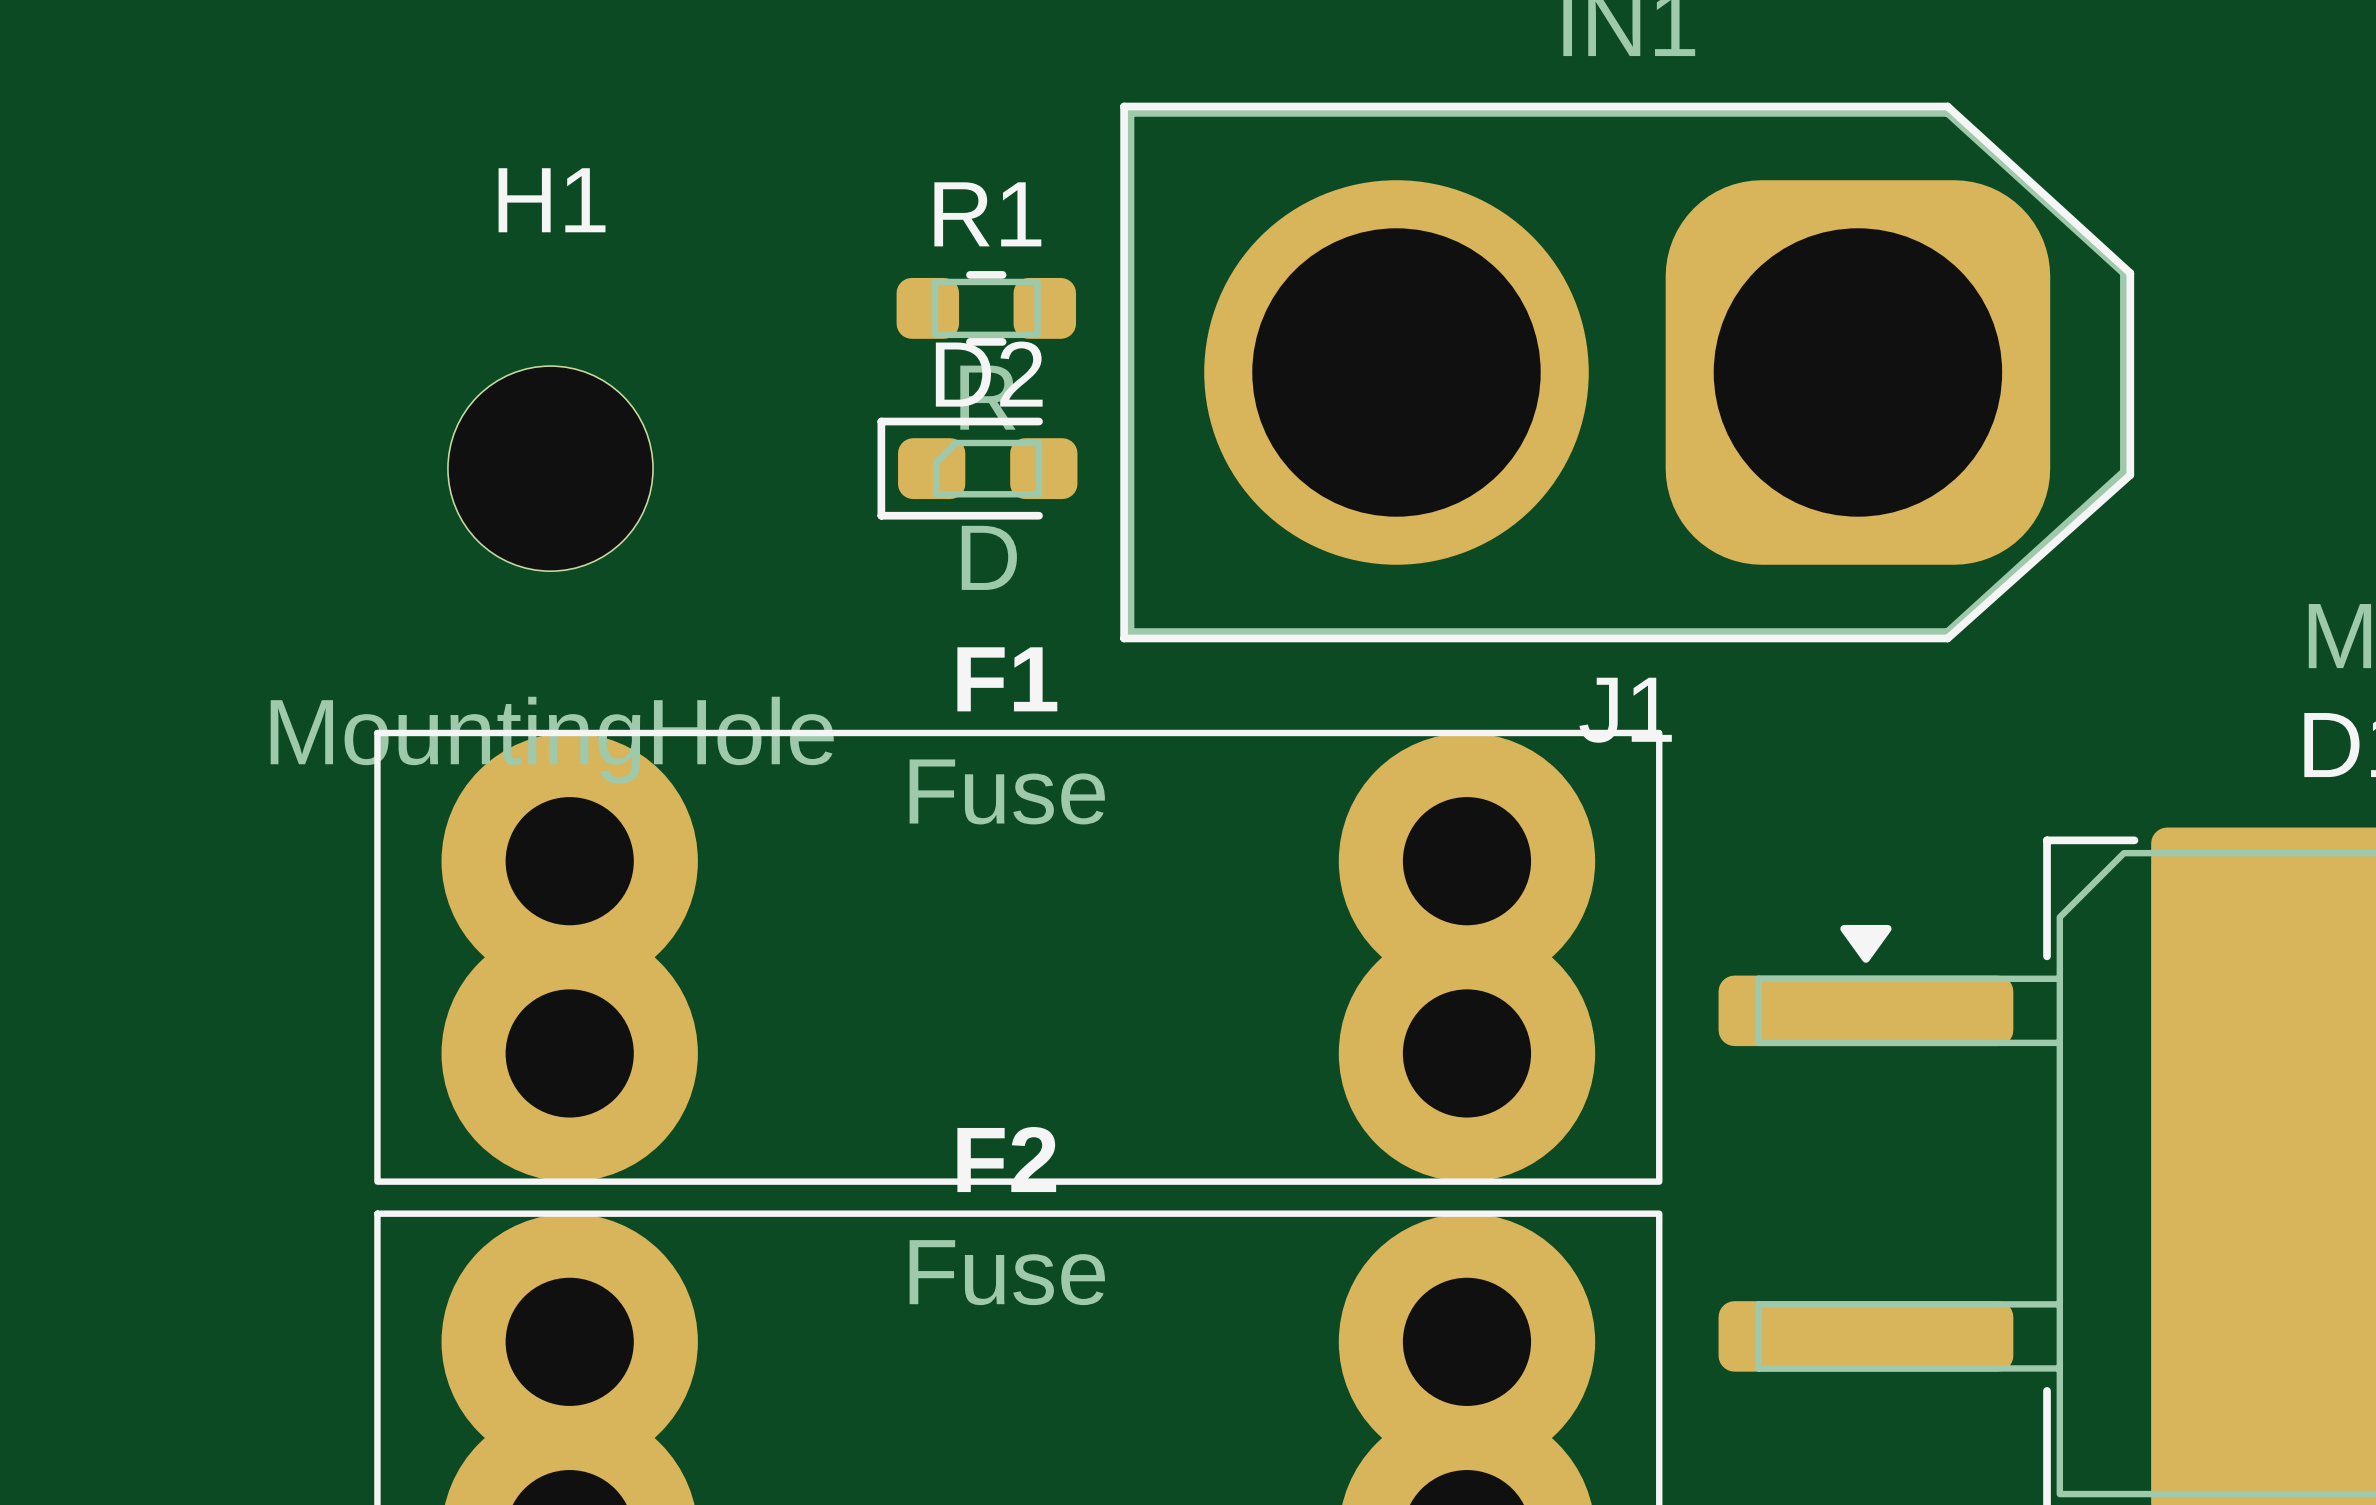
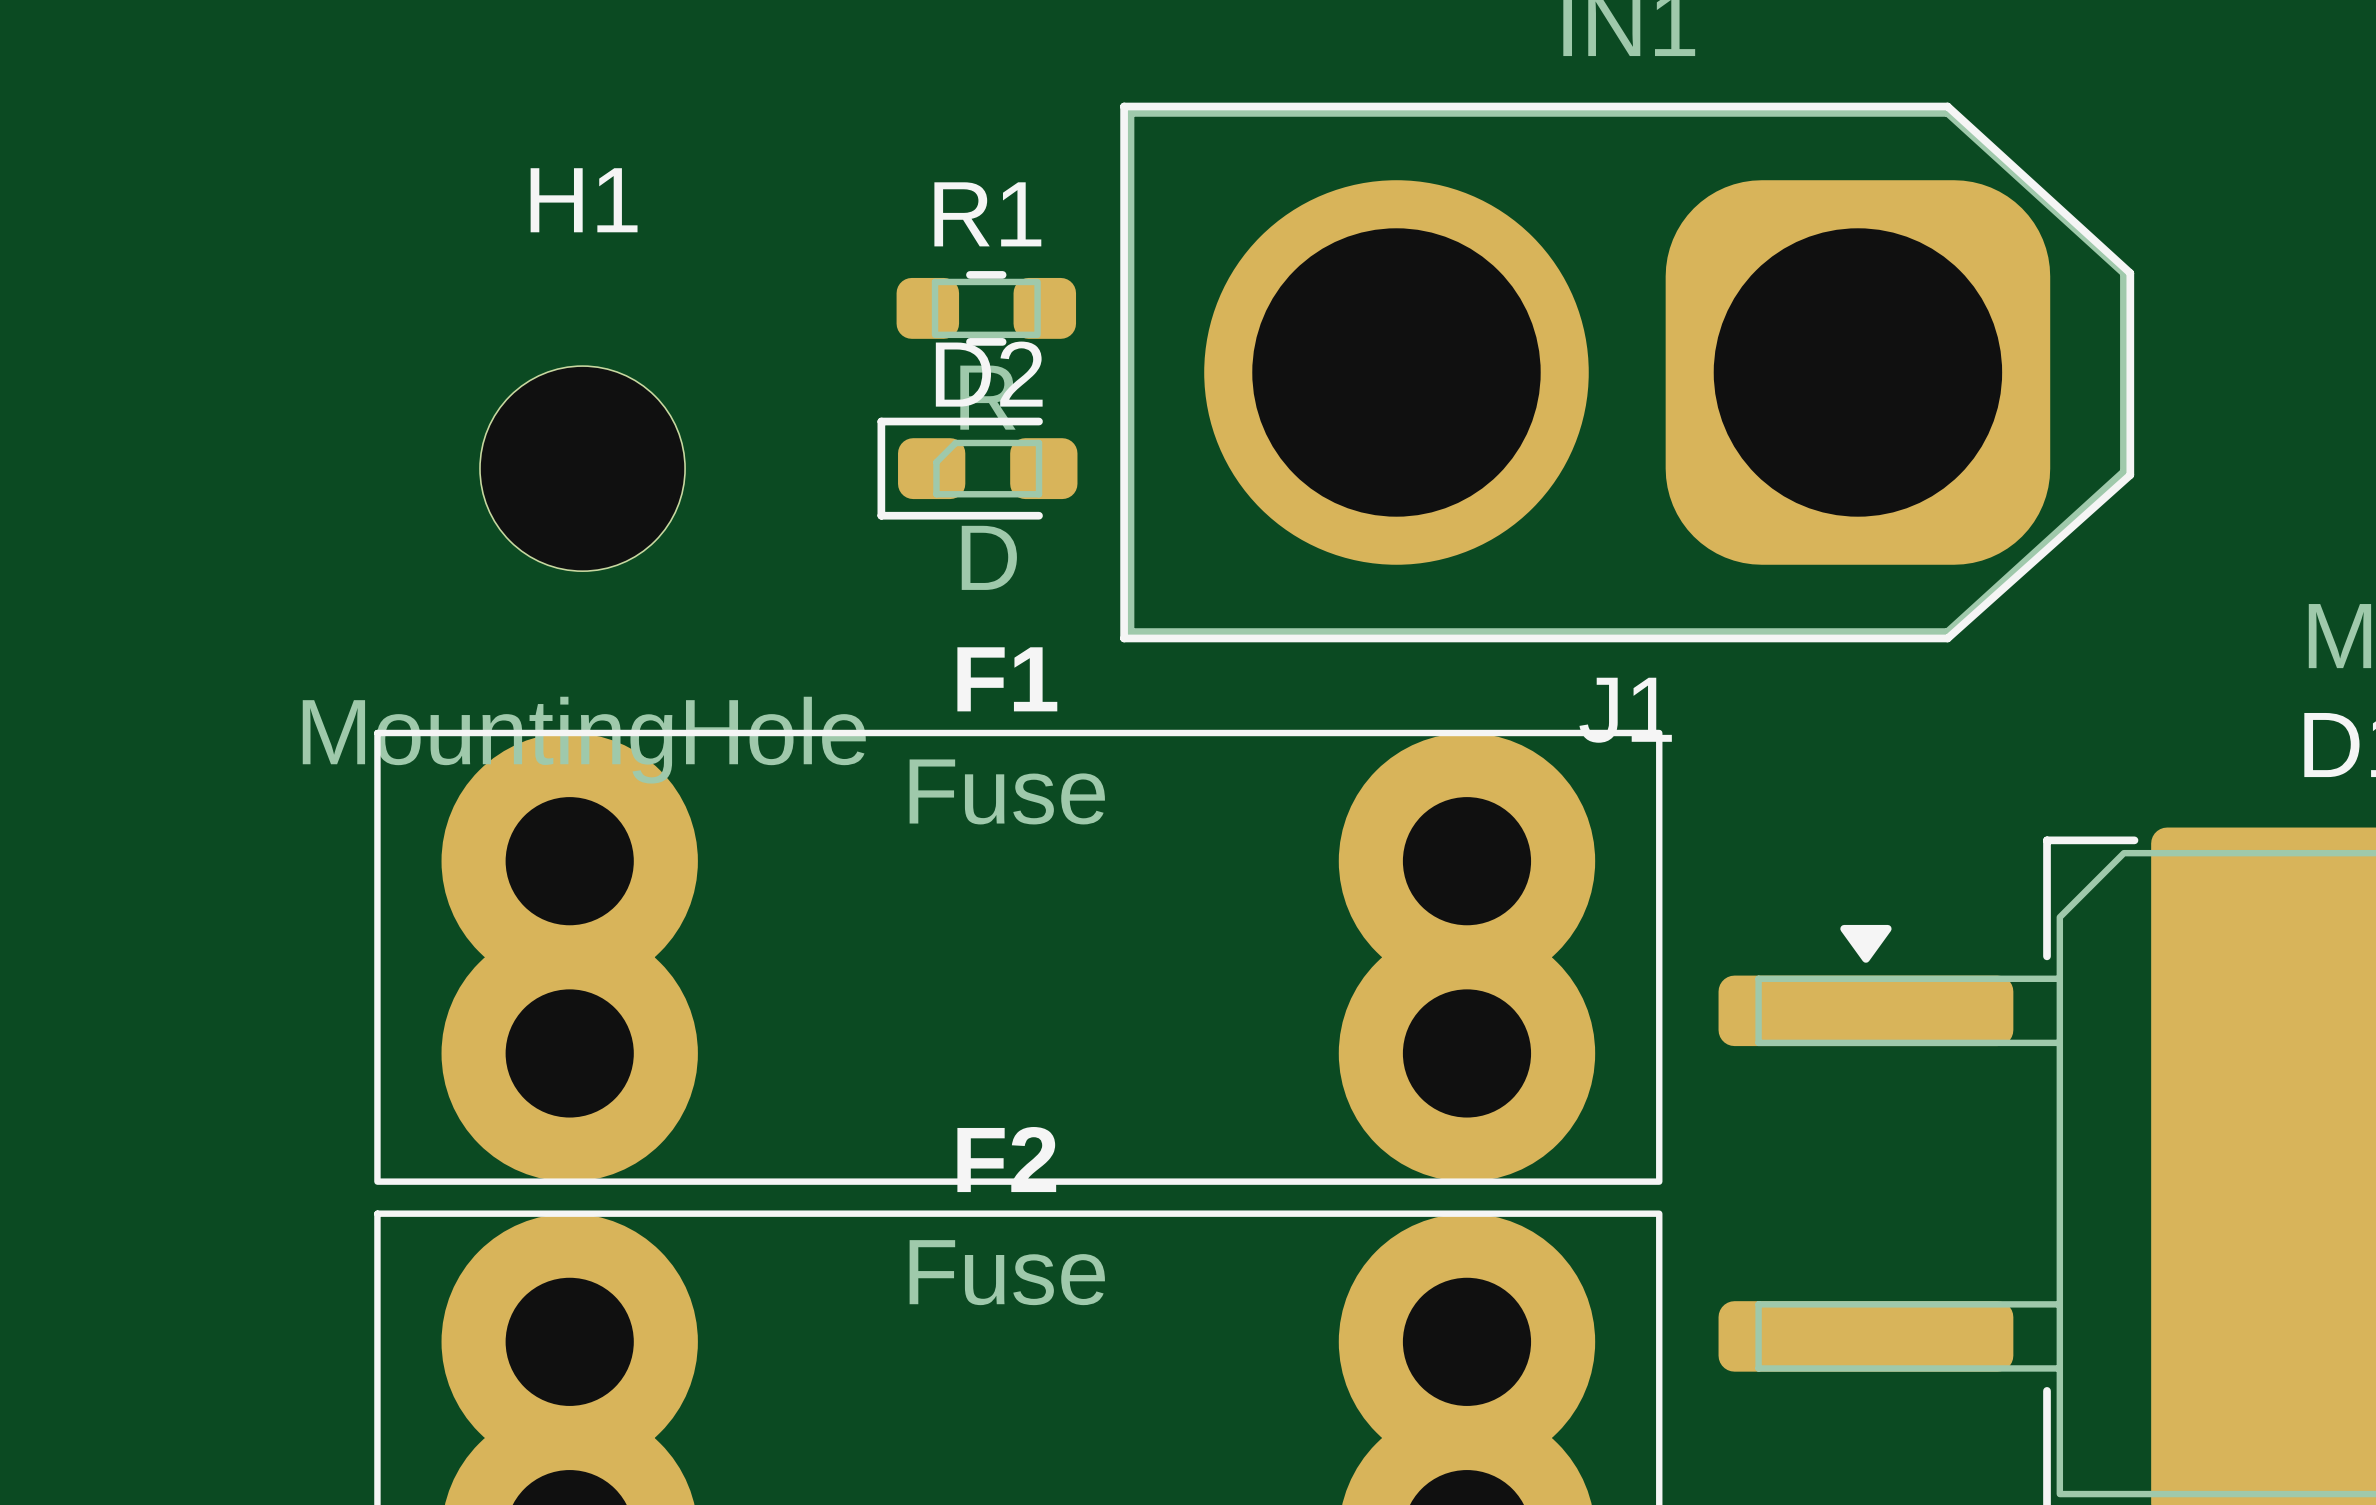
H1 position: (550, 468) -> (582, 468)

